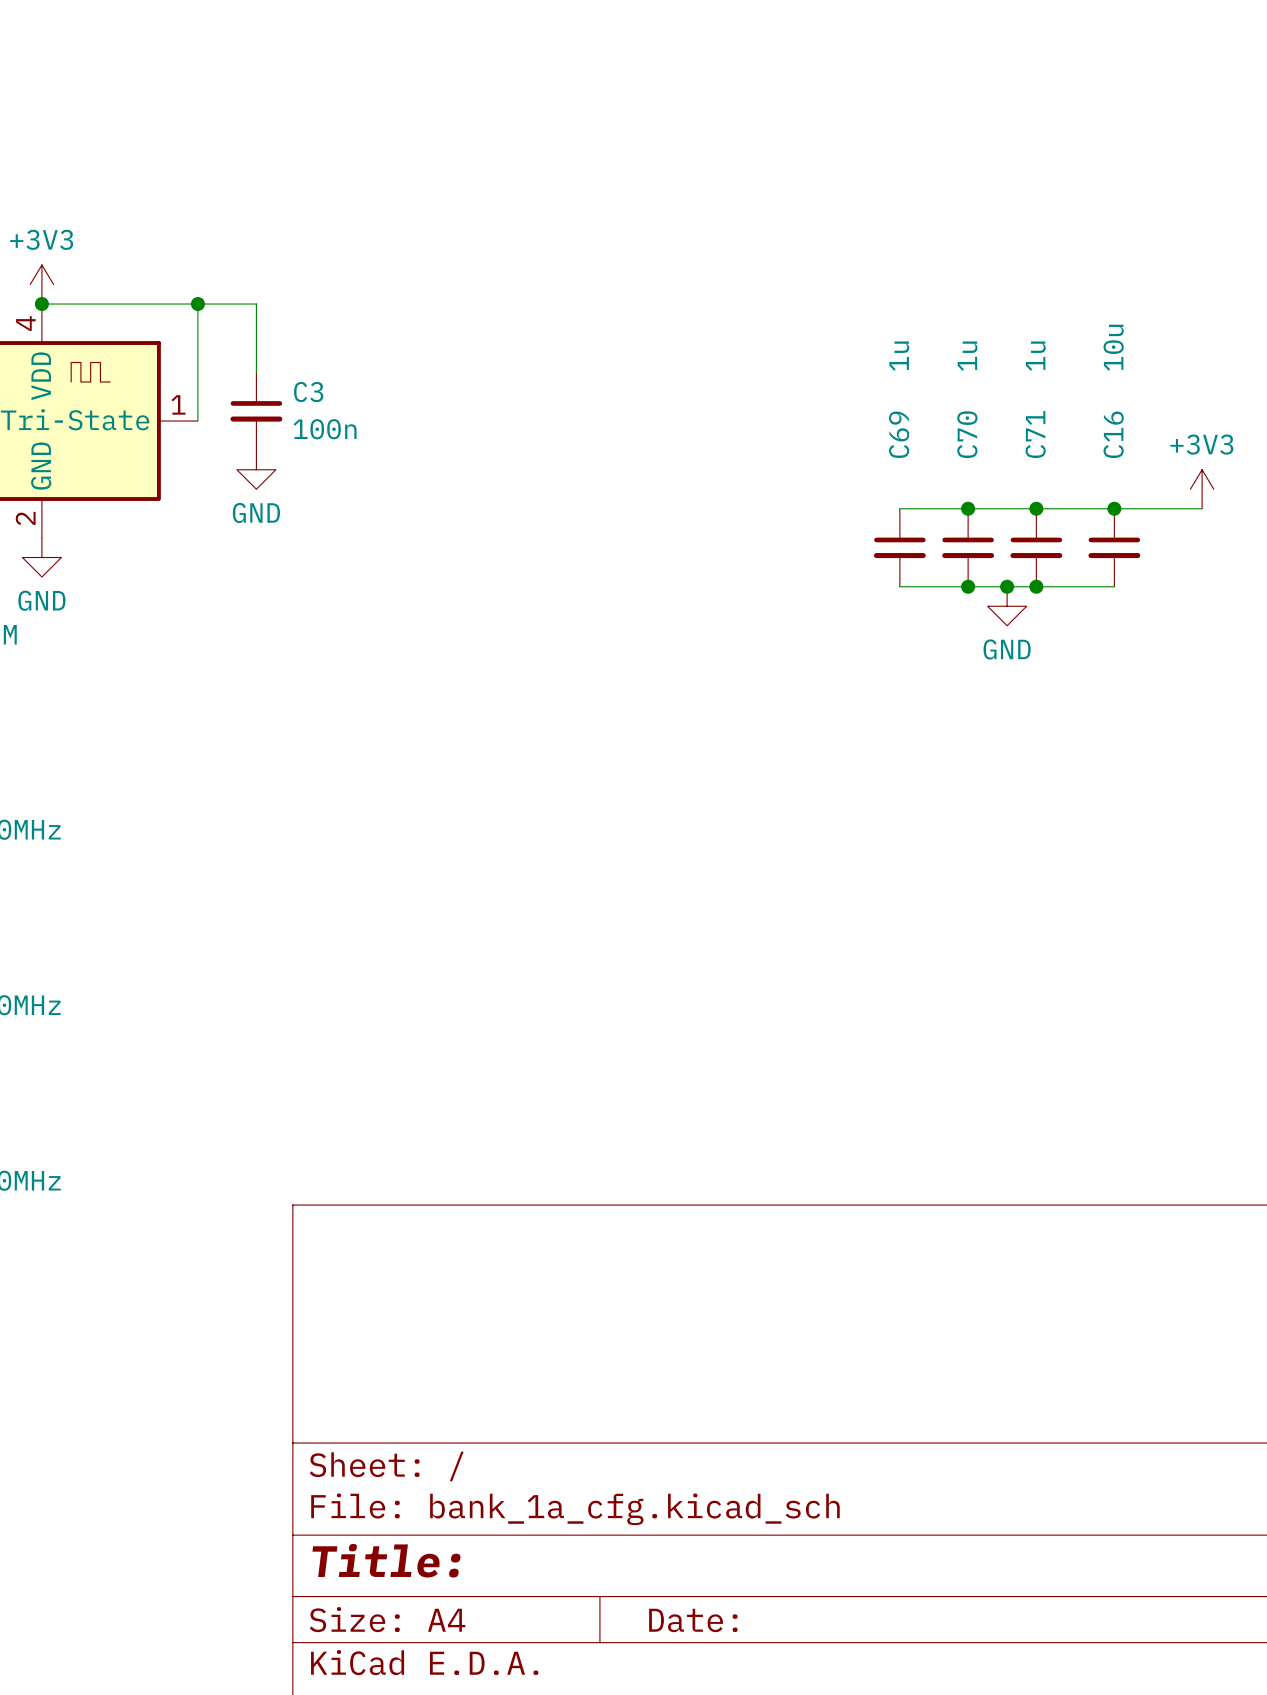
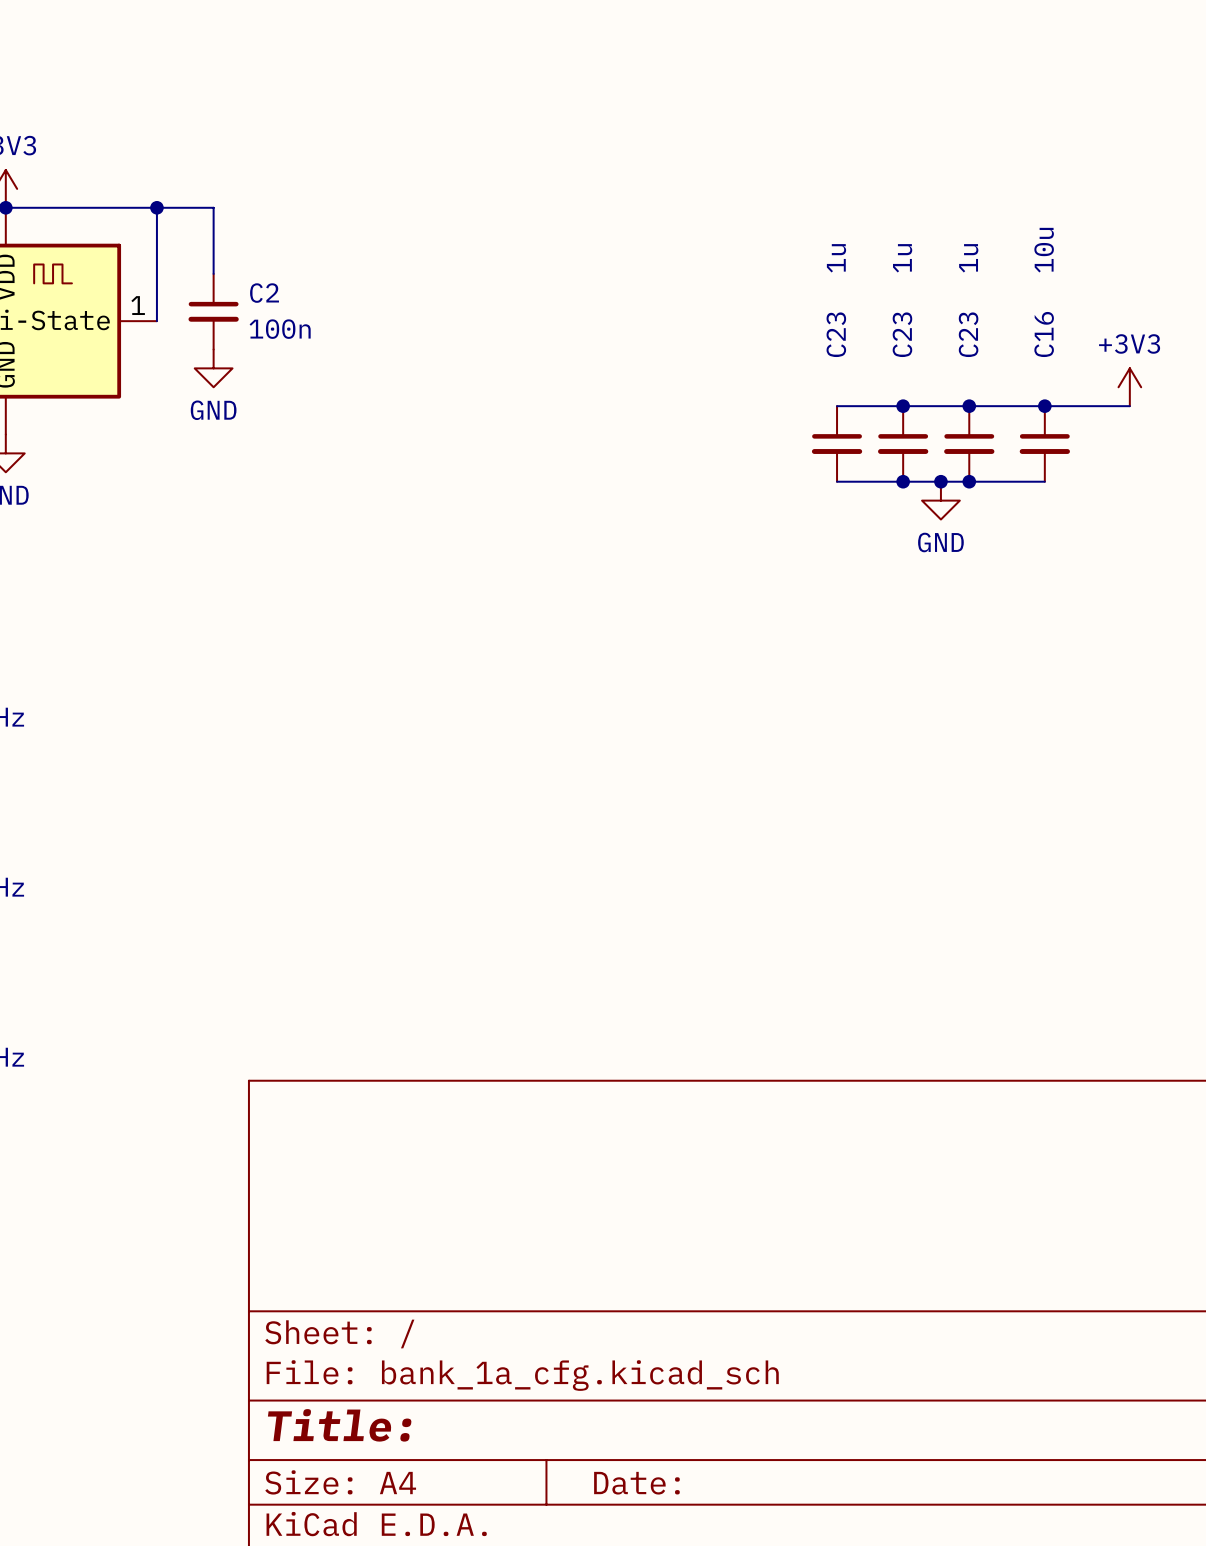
C3 name: C3 (308, 392) -> C2 (264, 293)
C69 name: C69 (899, 434) -> C23 (836, 334)
C70 name: C70 (967, 434) -> C23 (902, 334)
C71 name: C71 (1035, 434) -> C23 (968, 334)

